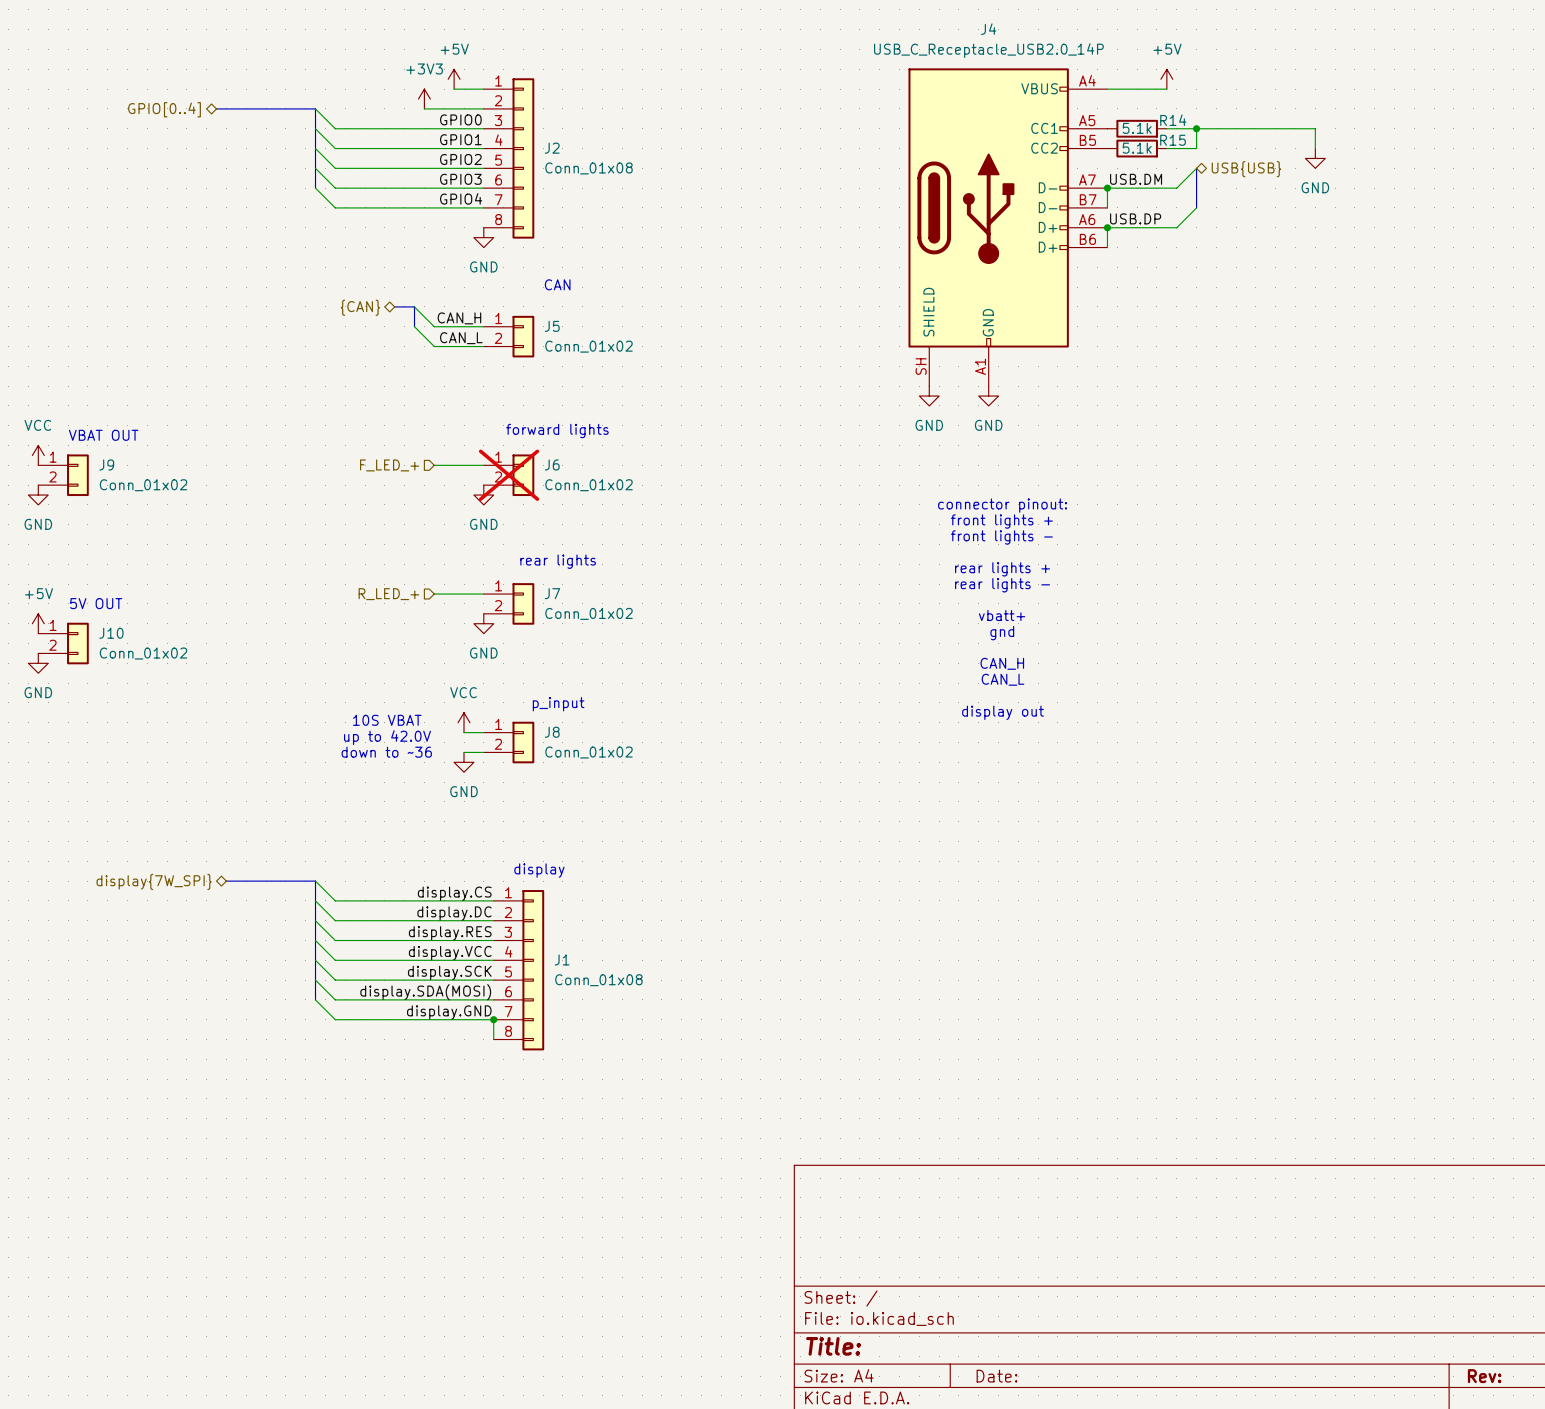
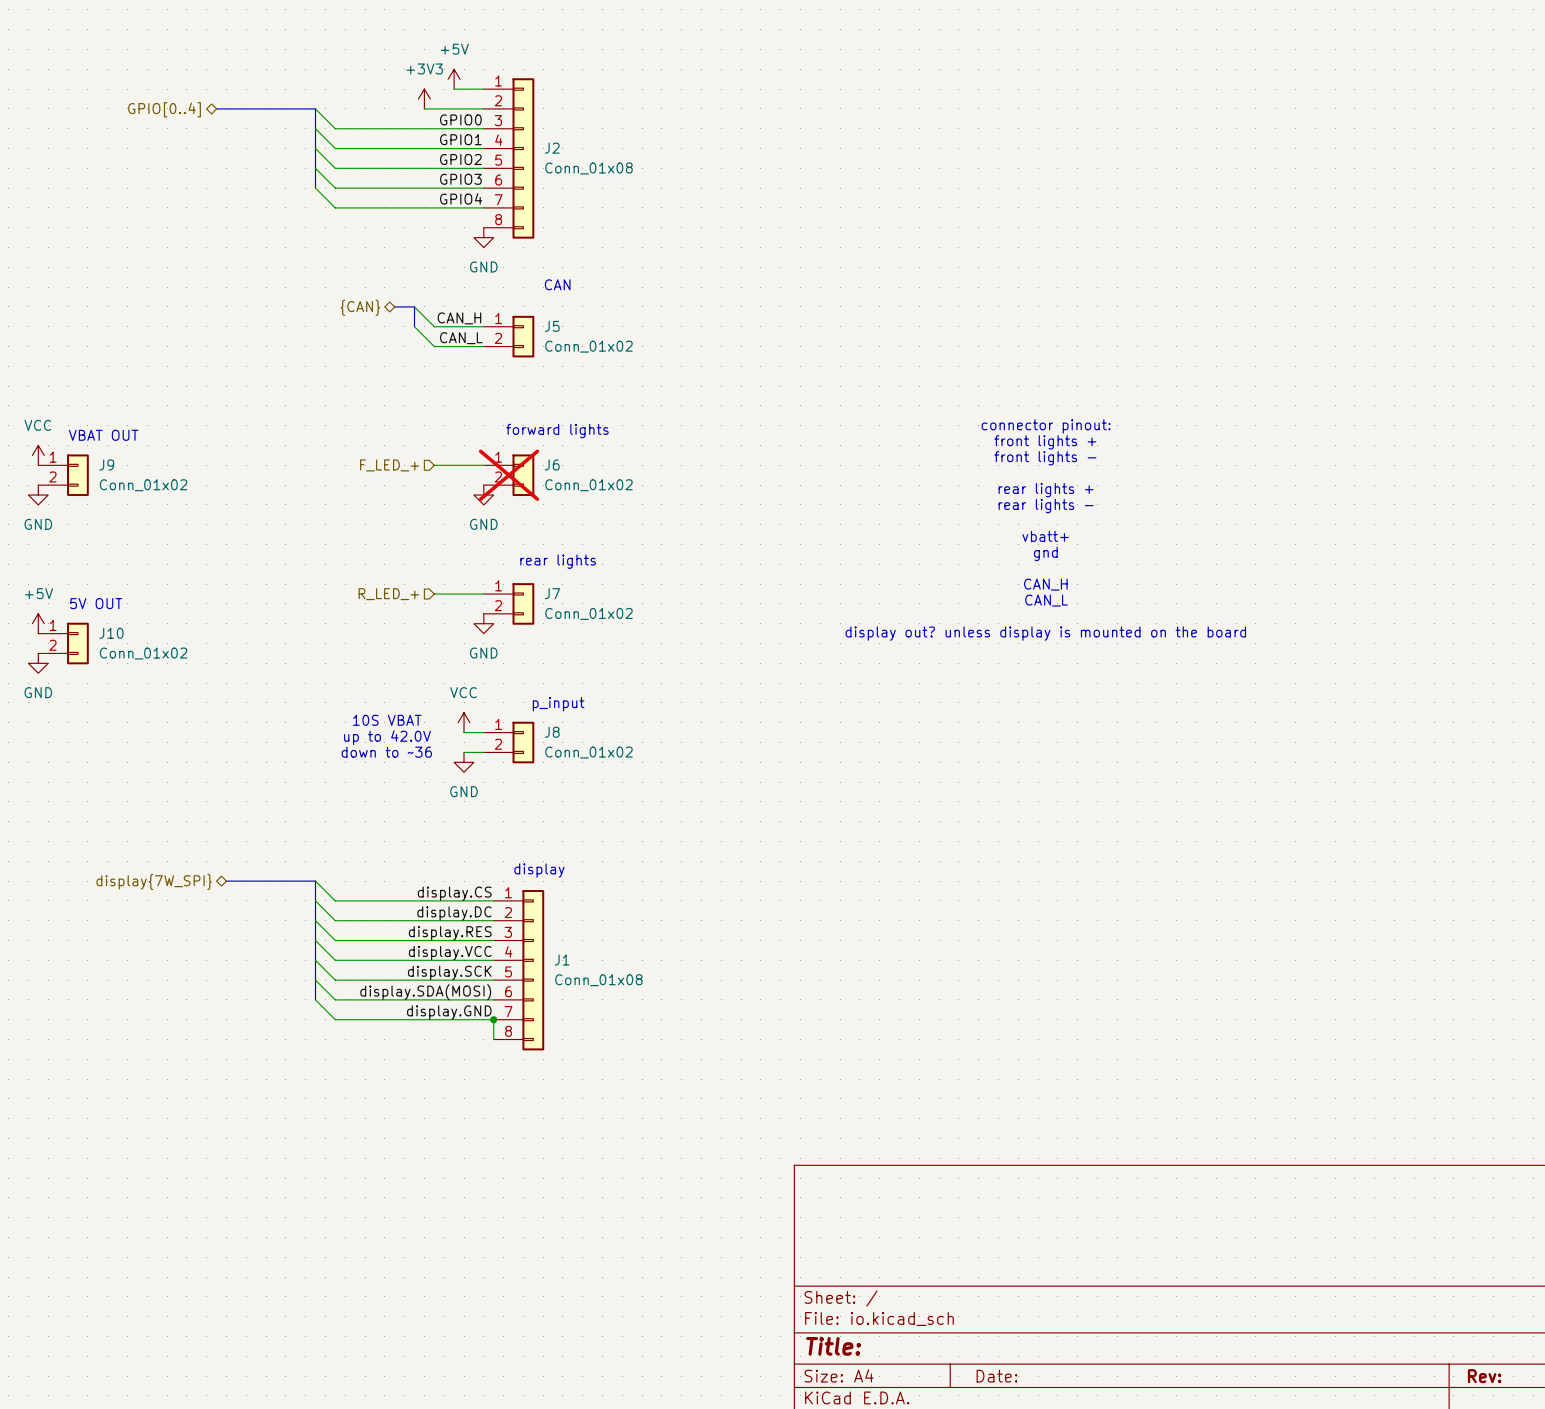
power symbol: +5V (1166, 79) -> none
wire: (1107, 89) (1166, 89) -> none
R14: 5.1k (1137, 128) -> none
wire: (1166, 128) (1315, 128) (1315, 148) -> none
wire: (1196, 128) (1196, 148) (1166, 148) -> none
junction: (1196, 128) -> none
R15: 5.1k (1137, 148) -> none
power symbol: GND (1315, 158) -> none
wire: (1196, 168) (1176, 188) (1107, 188) (1107, 207) -> none
bus: (1196, 168) (1196, 207) -> none
hierarchical label: USB{USB} (1246, 169) -> none
label: USB.DM (1136, 179) -> none
junction: (1107, 188) -> none
wire: (1196, 207) (1176, 227) (1107, 227) (1107, 247) -> none
label: USB.DP (1135, 218) -> none
J4: USB_C_Receptacle_USB2.0_14P (1007, 227) -> none
junction: (1107, 227) -> none
power symbol: GND (929, 396) -> none
power symbol: GND (988, 396) -> none
text position: connector pinout: (1002, 505) -> connector pinout: (1046, 426)
text position: front lights + (1001, 521) -> front lights + (1045, 442)
text position: front lights - (1001, 537) -> front lights - (1045, 458)
text position: rear lights + (1002, 569) -> rear lights + (1046, 490)
text position: rear lights - (1002, 585) -> rear lights - (1046, 506)
text position: vbatt+ (1002, 615) -> vbatt+ (1045, 536)
text position: gnd (1002, 633) -> gnd (1045, 553)
text: none -> display out? unless display is mounted on the board (1045, 633)
text position: CAN_H (1002, 663) -> CAN_H (1045, 584)
text position: CAN_L (1003, 679) -> CAN_L (1046, 600)
text: display out (1003, 712) -> none

